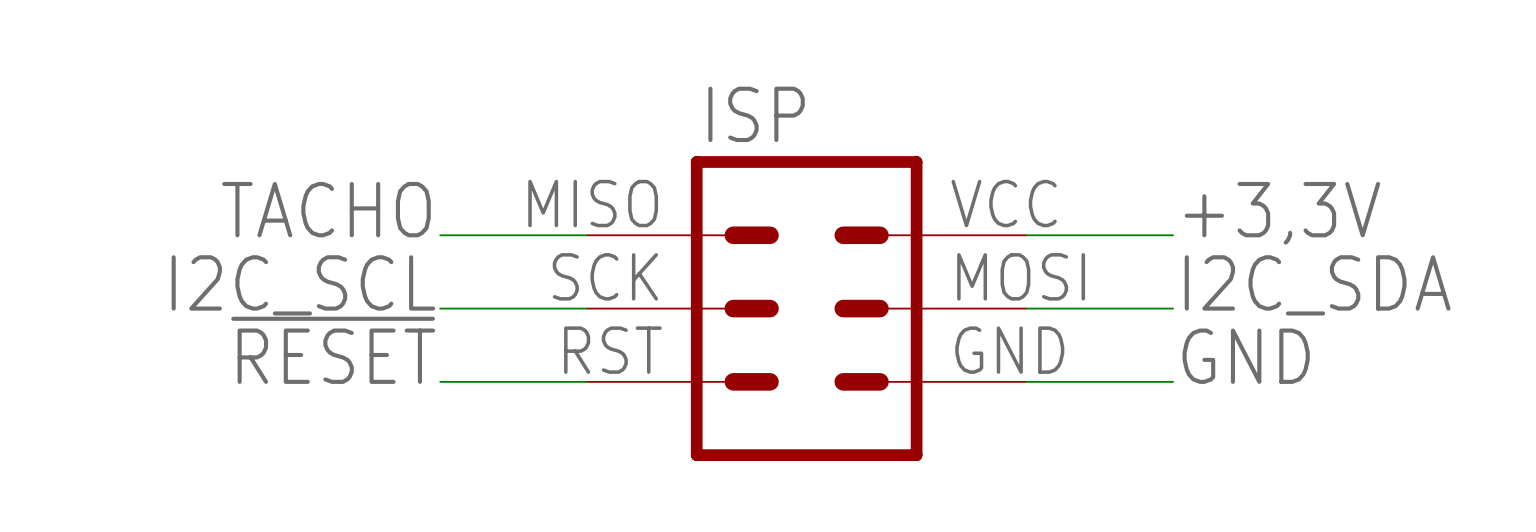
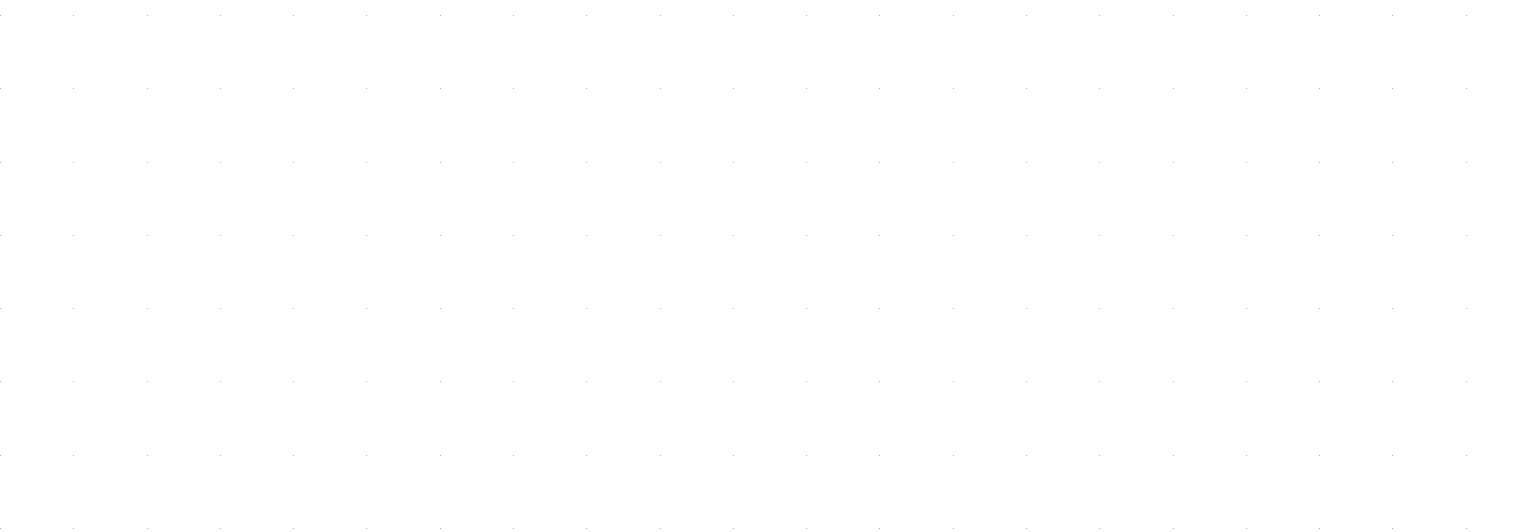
label: TACHO (326, 209) -> none
label: +3,3V (1282, 213) -> none
wire: (440, 235) (586, 235) -> none
wire: (1026, 235) (1173, 235) -> none
label: I2C_SCL (303, 285) -> none
label: I2C_SDA (1317, 285) -> none
wire: (440, 308) (586, 308) -> none
ISP: (806, 308) -> none
wire: (1026, 308) (1173, 308) -> none
label: ~{RESET} (333, 350) -> none
label: GND (1246, 356) -> none
wire: (440, 381) (586, 381) -> none
wire: (1026, 381) (1173, 381) -> none

